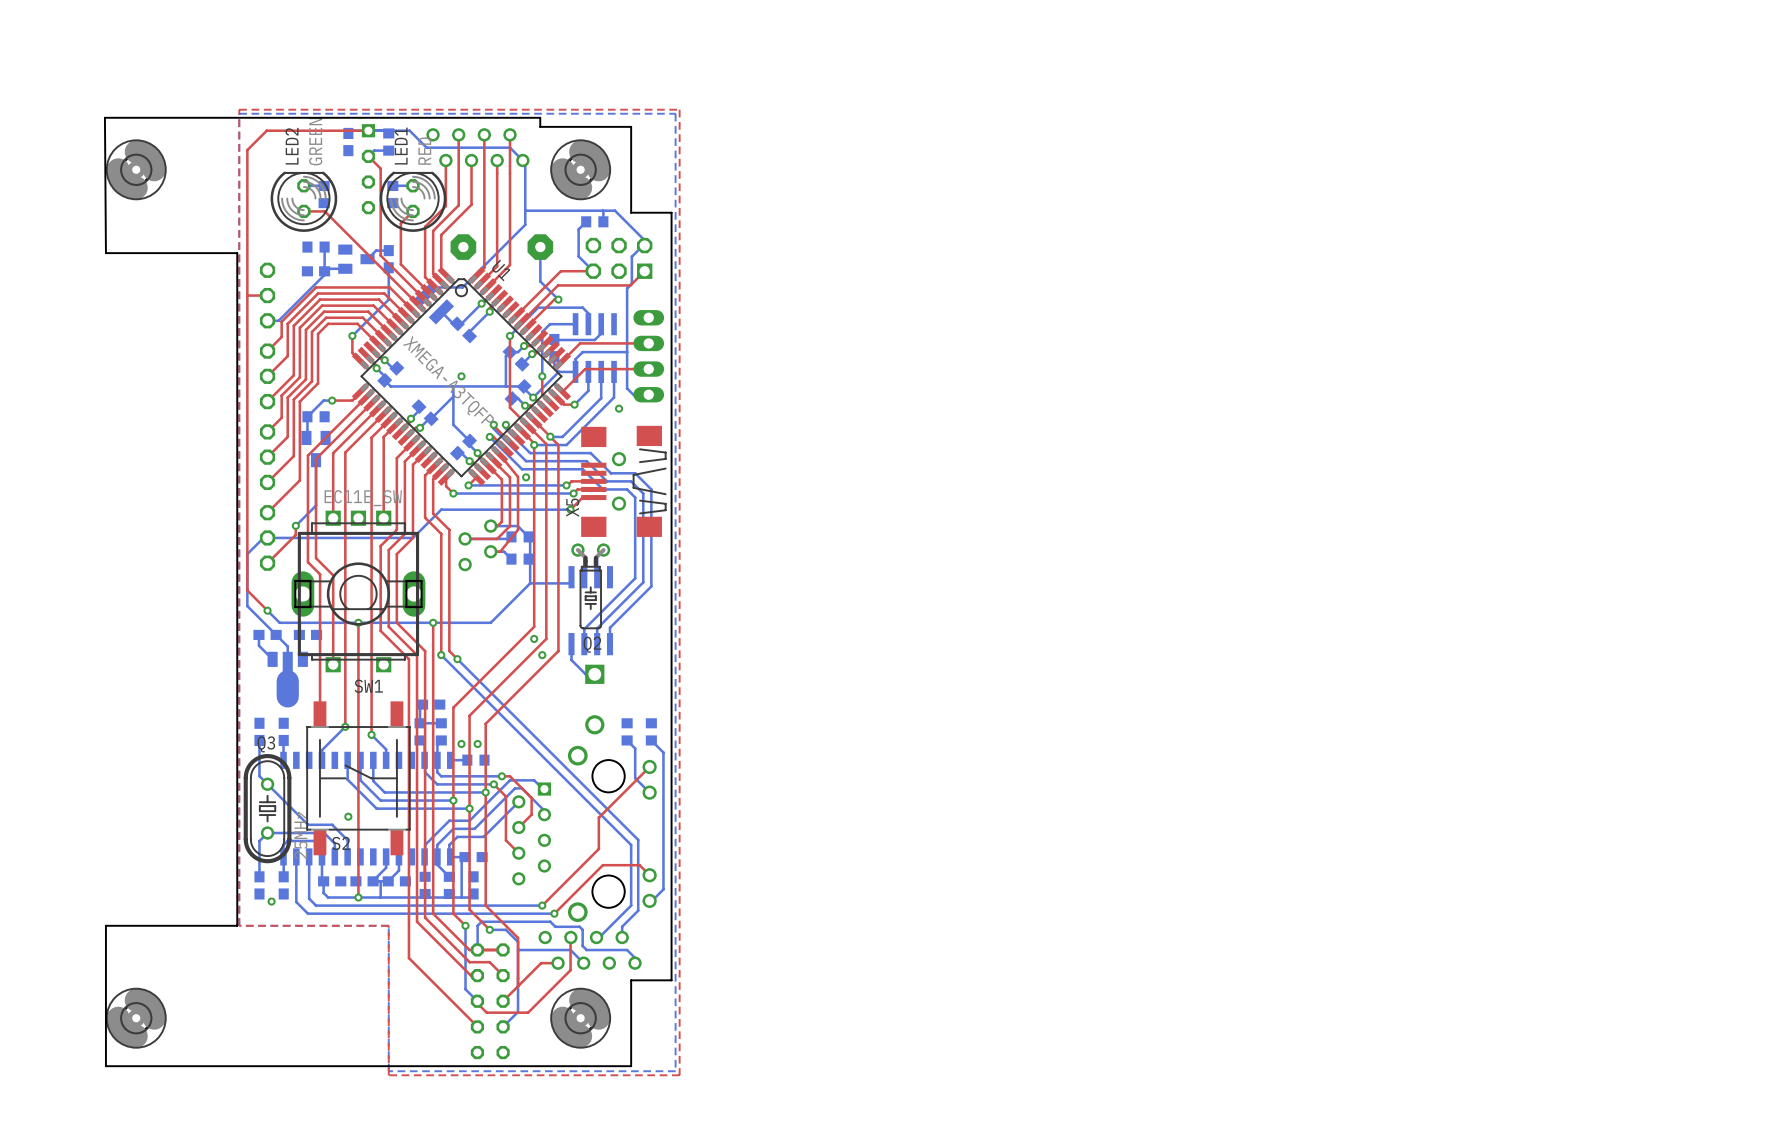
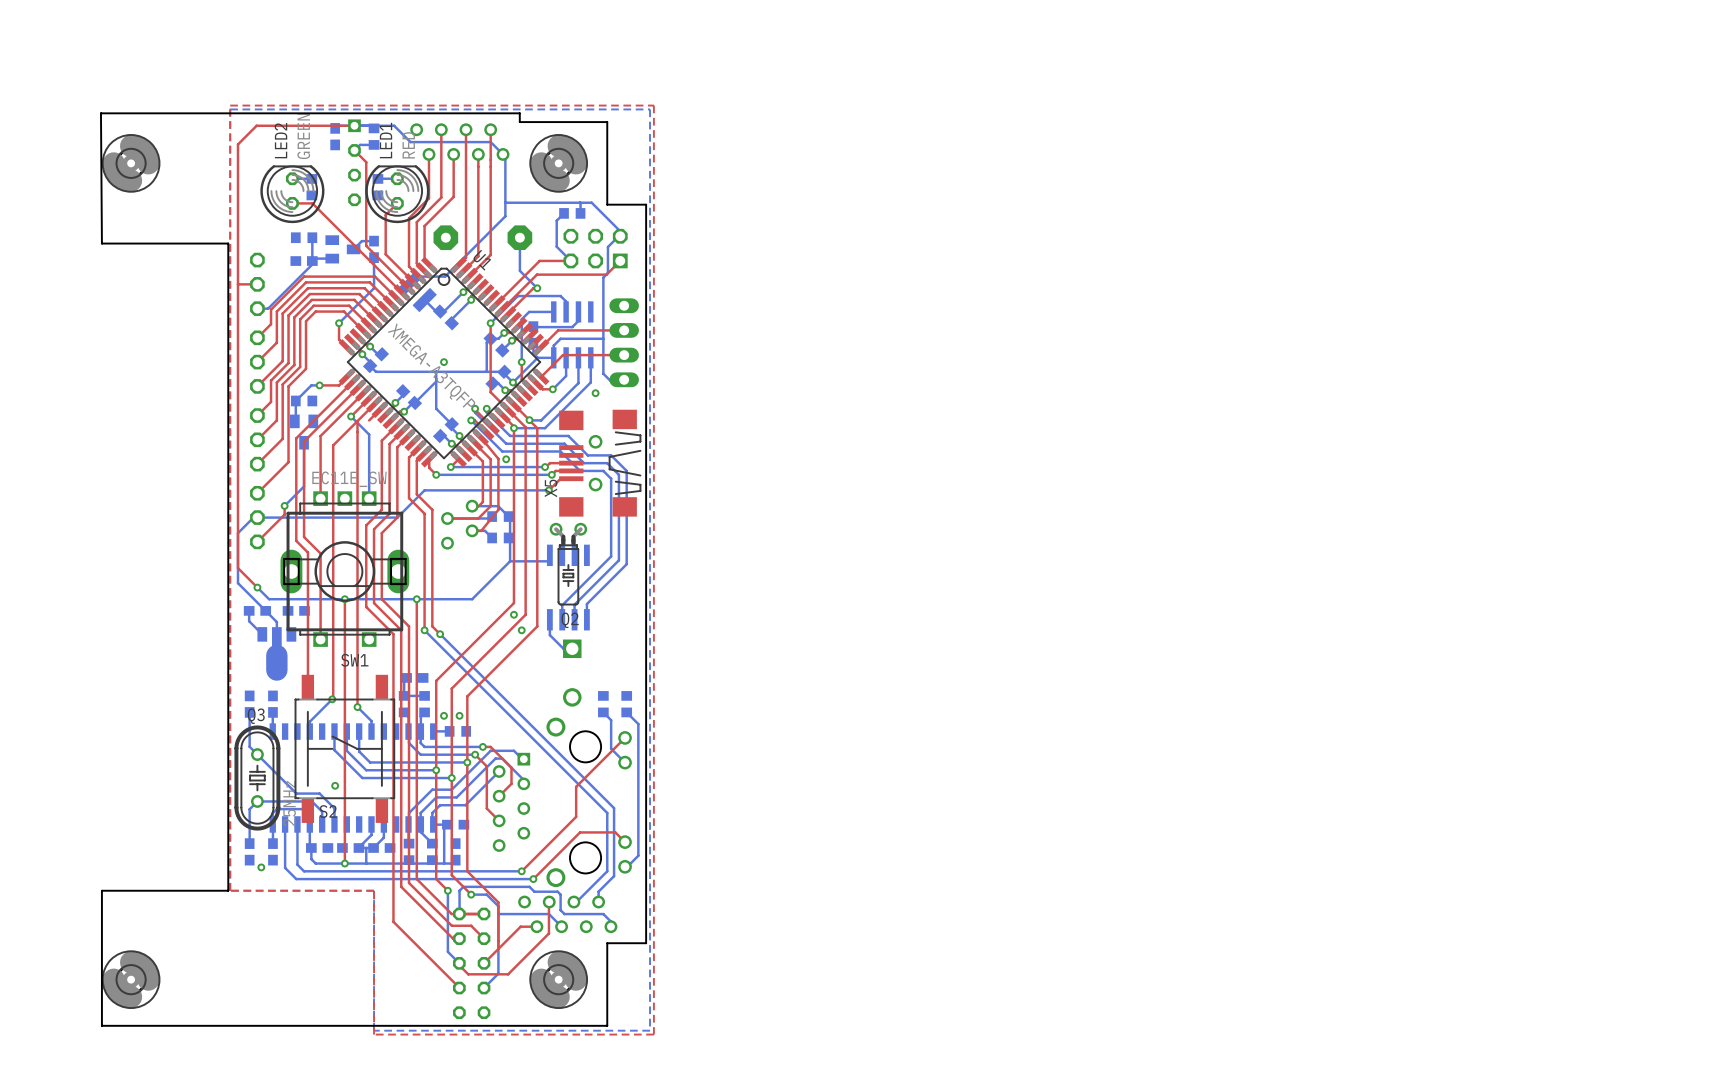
bottom track: none -> (351, 416) (369, 434) (369, 498)
top track: (364, 432) (345, 452) (345, 726) -> none
via: none -> (351, 416)
top track: (383, 436) (383, 518) -> none
top track: none -> (357, 421) (333, 445) (333, 698)

